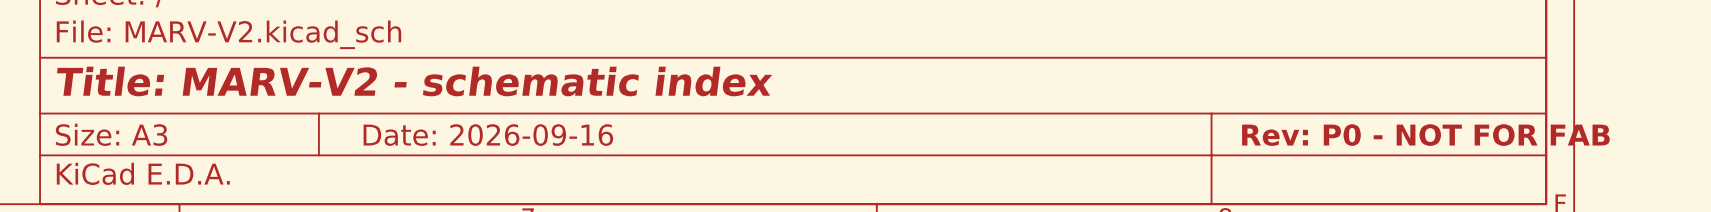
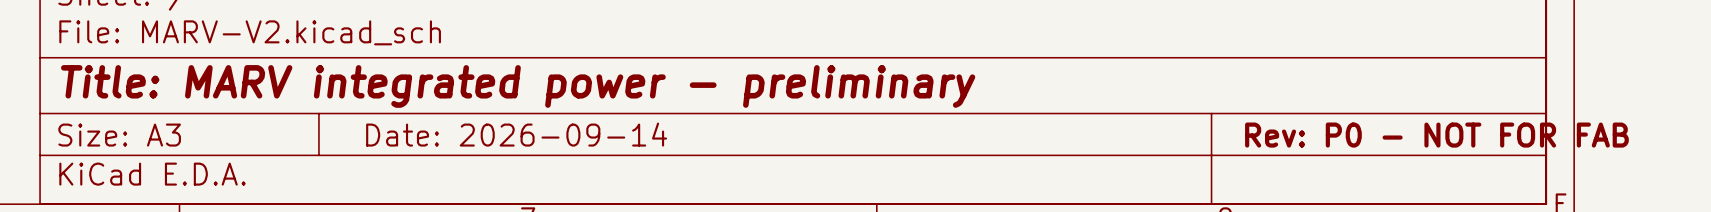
title block: Title: MARV-V2 - schematic index (414, 81) -> Title: MARV integrated power - preliminary (518, 86)
title block: Date: 2026-09-16 (488, 135) -> Date: 2026-09-14 (516, 134)

